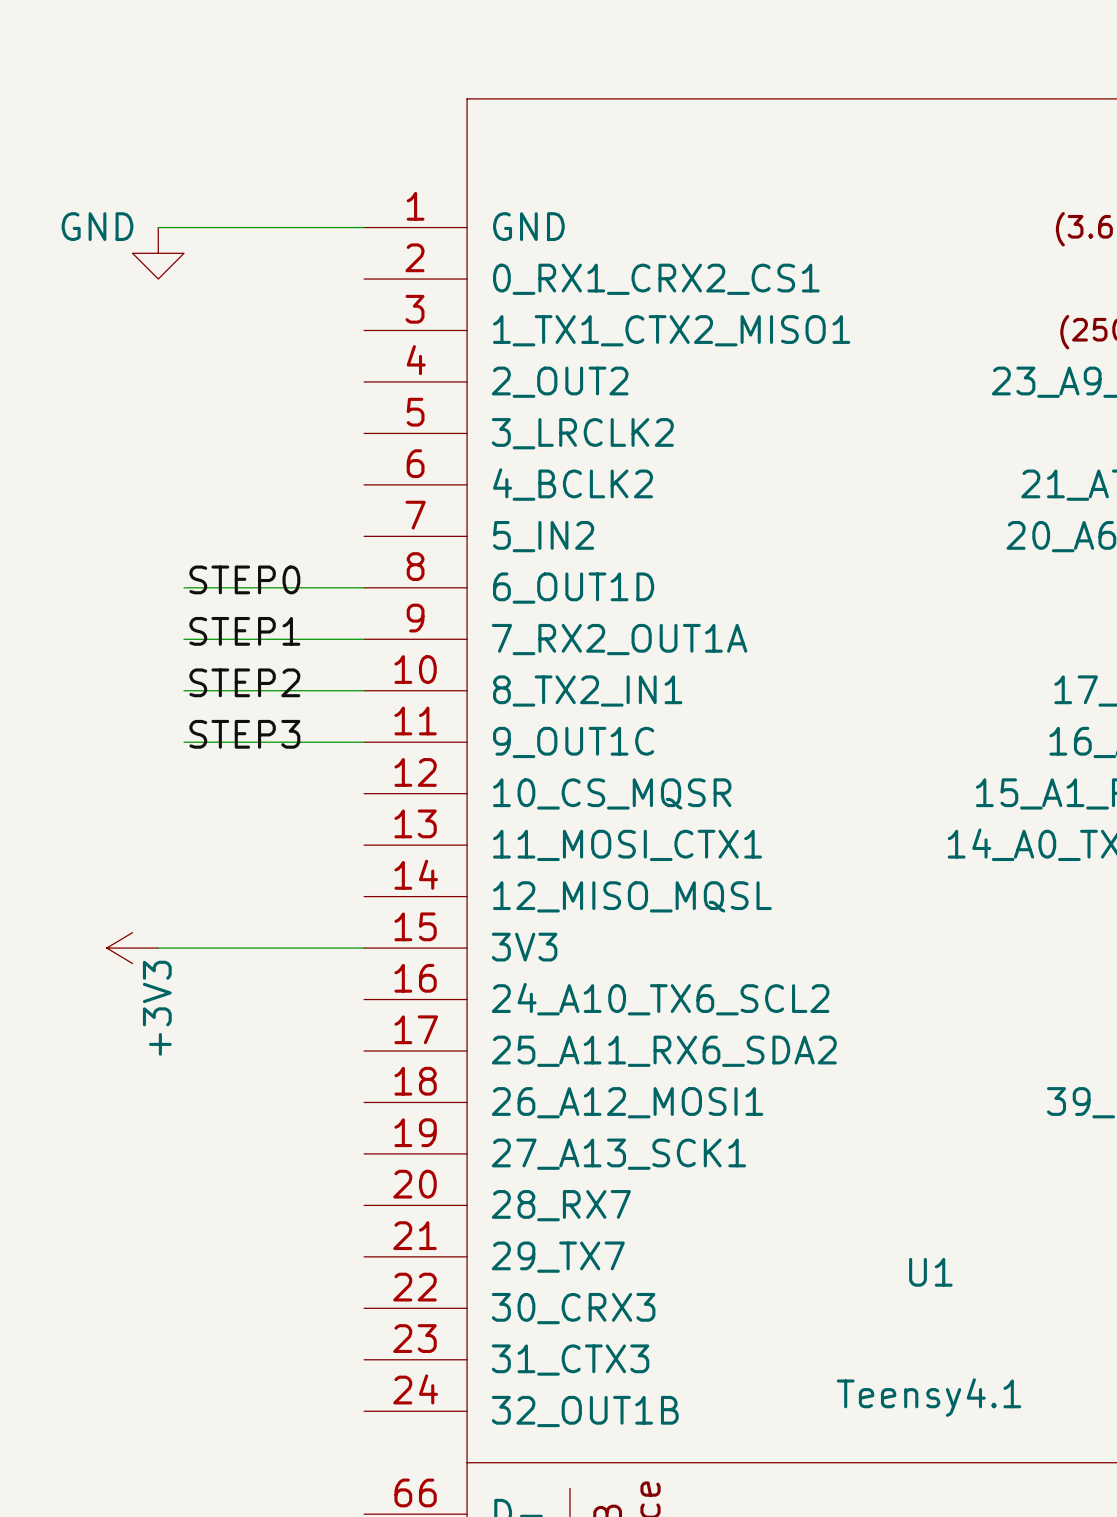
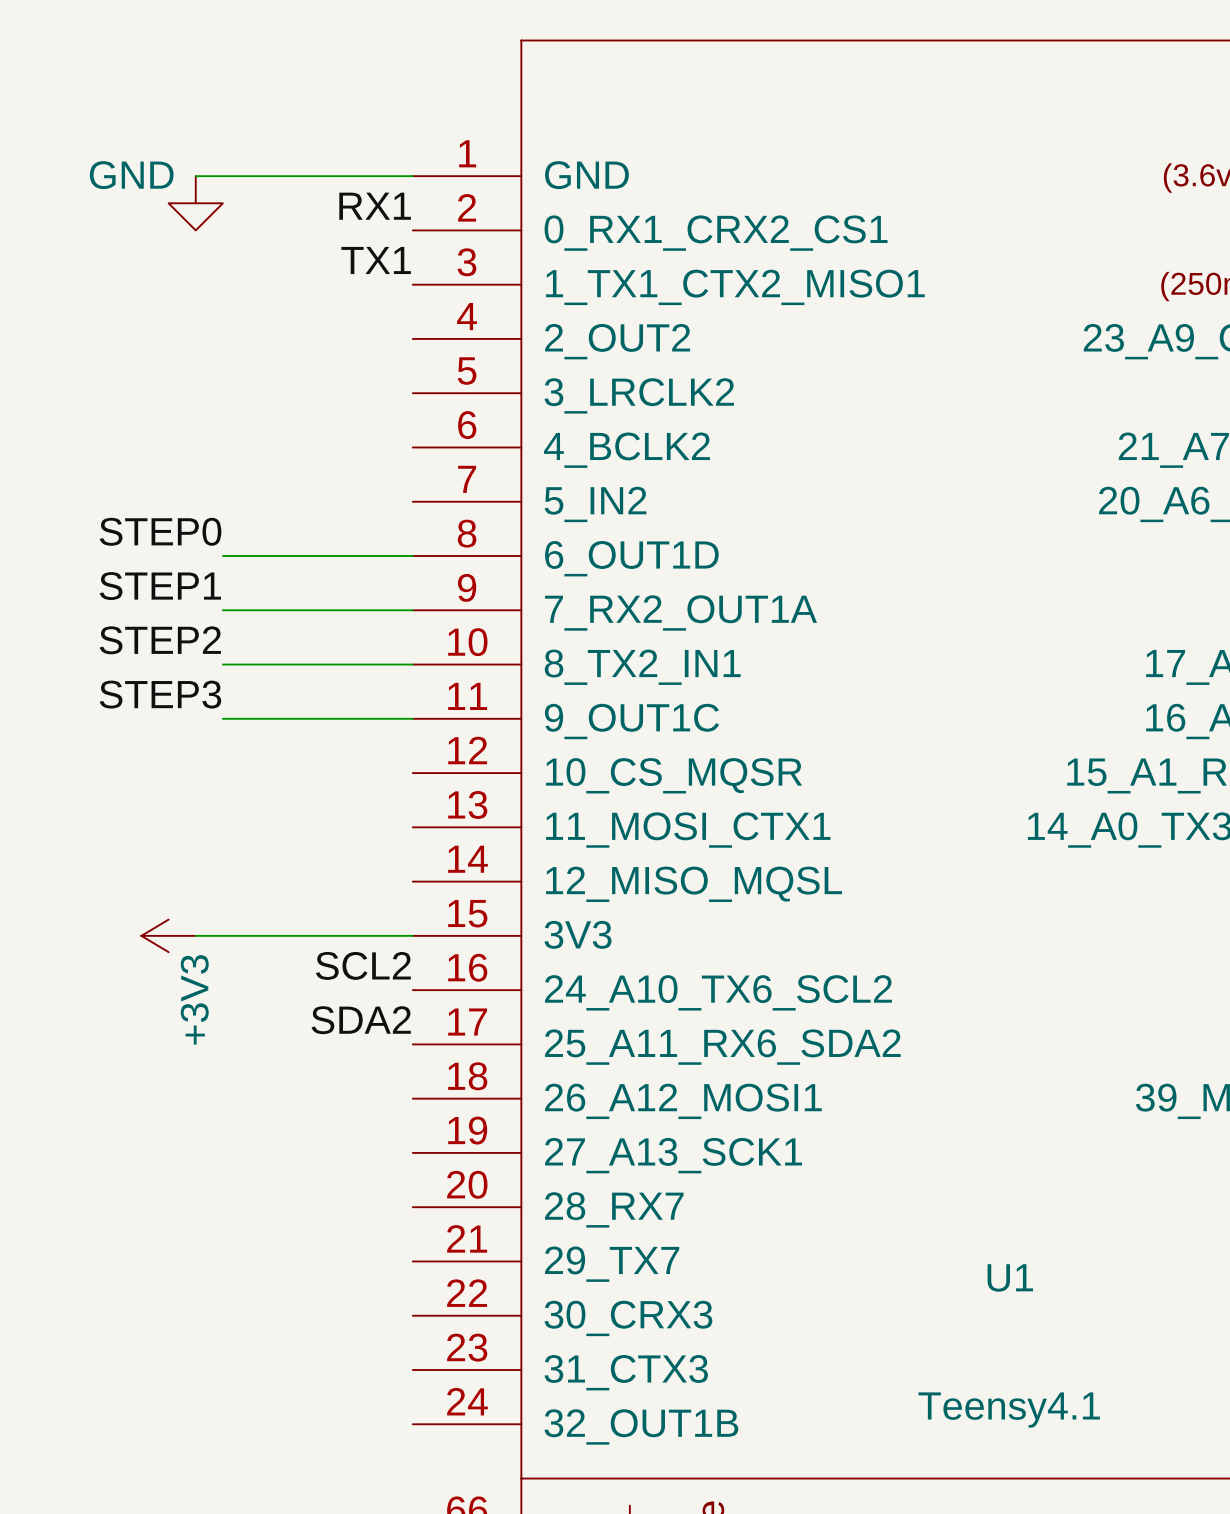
label: none -> RX1 (375, 206)
label: none -> TX1 (376, 260)
label position: STEP0 (244, 579) -> STEP0 (160, 531)
label position: STEP1 (244, 631) -> STEP1 (160, 586)
label position: STEP2 (244, 682) -> STEP2 (160, 640)
label position: STEP3 (244, 734) -> STEP3 (160, 694)
label: none -> SCL2 (363, 965)
label: none -> SDA2 (361, 1020)

